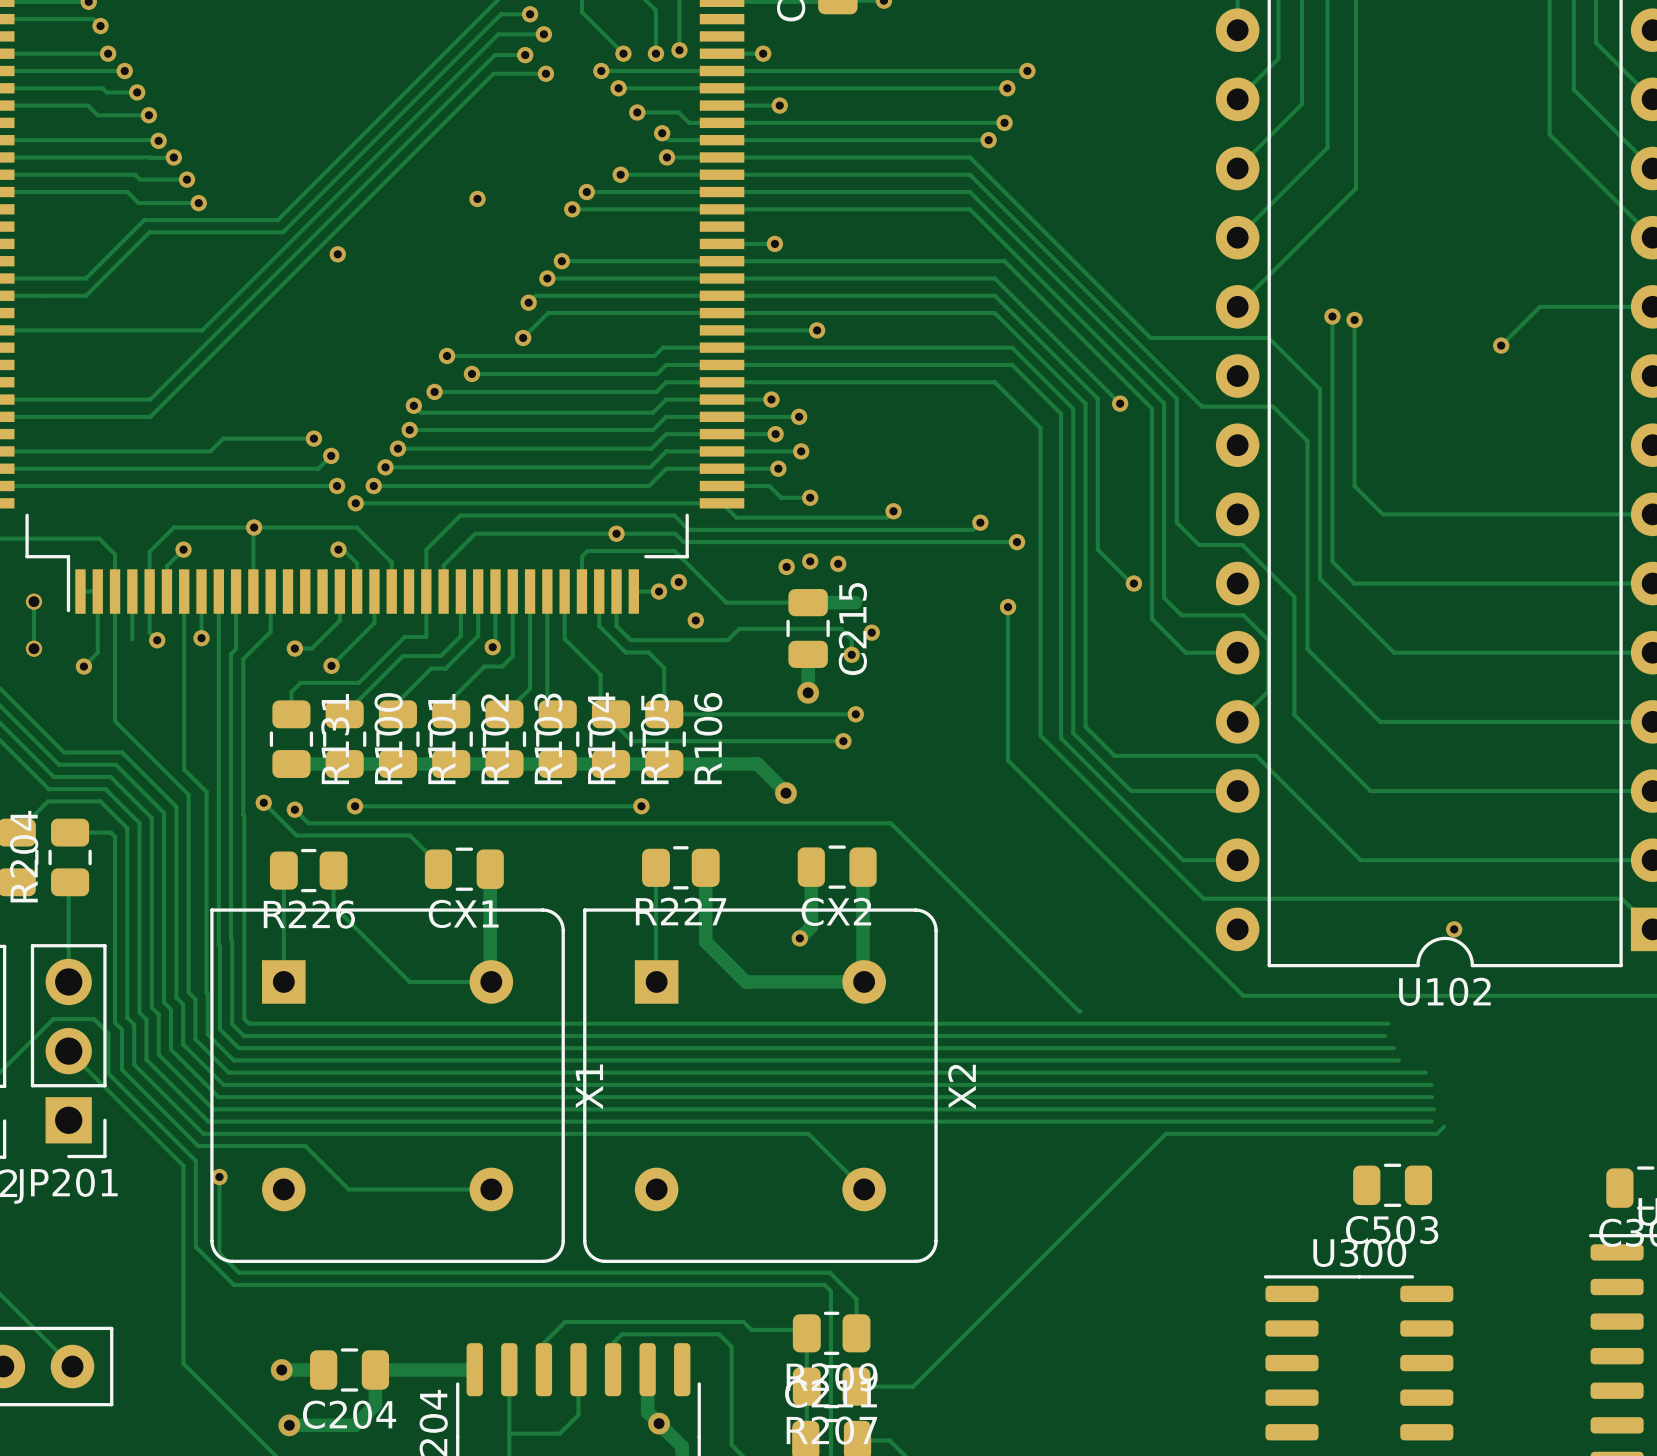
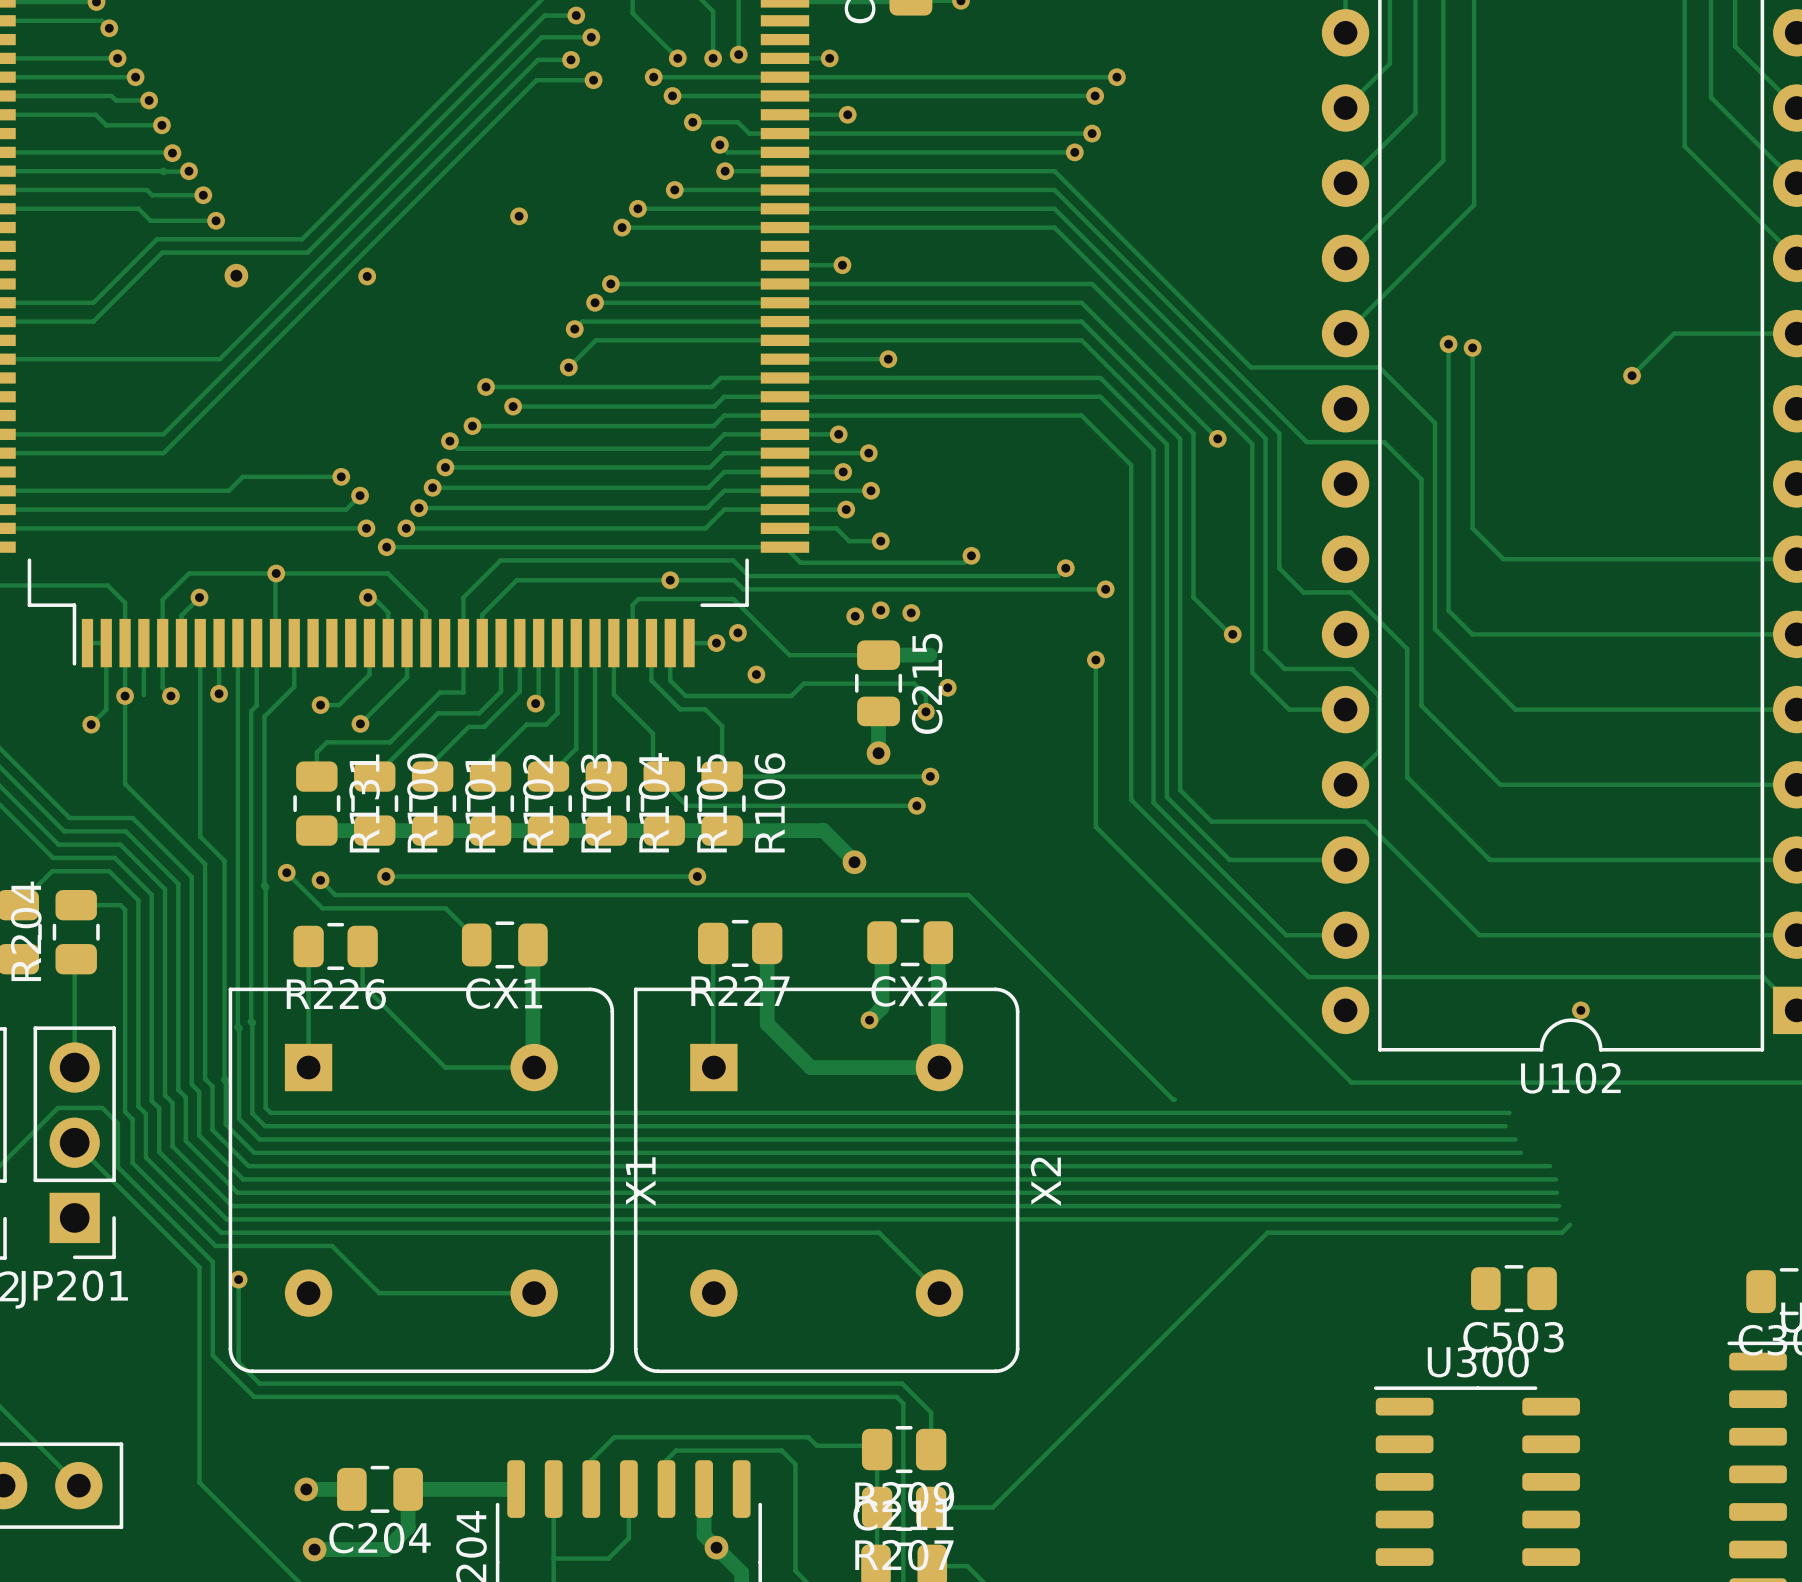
via: none -> (236, 275)
track: (33, 601) (33, 648) -> none
via: (33, 601) -> none
via: none -> (125, 696)
via: (33, 648) -> none

